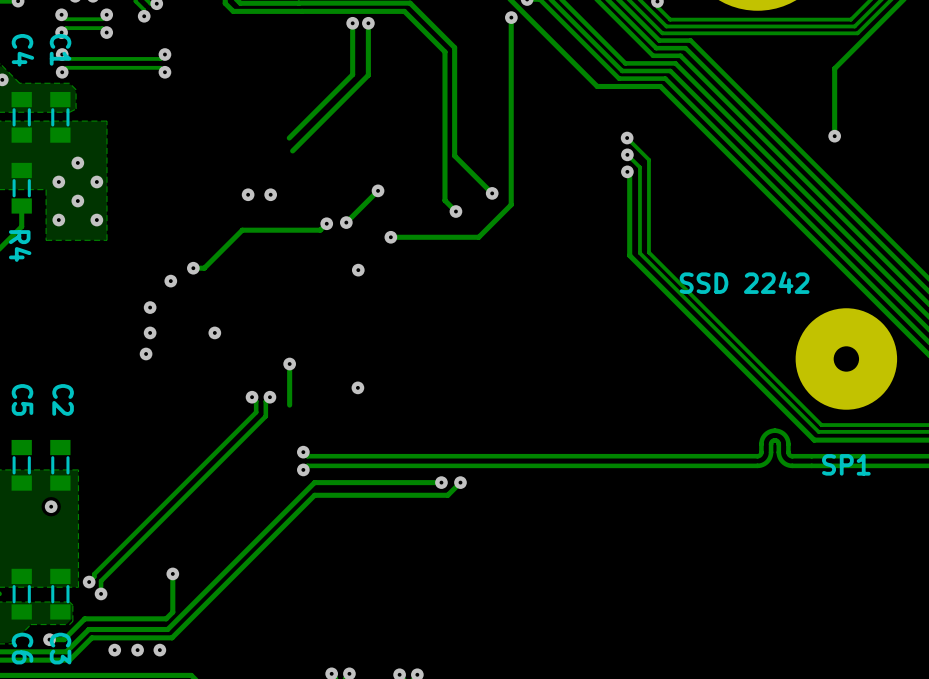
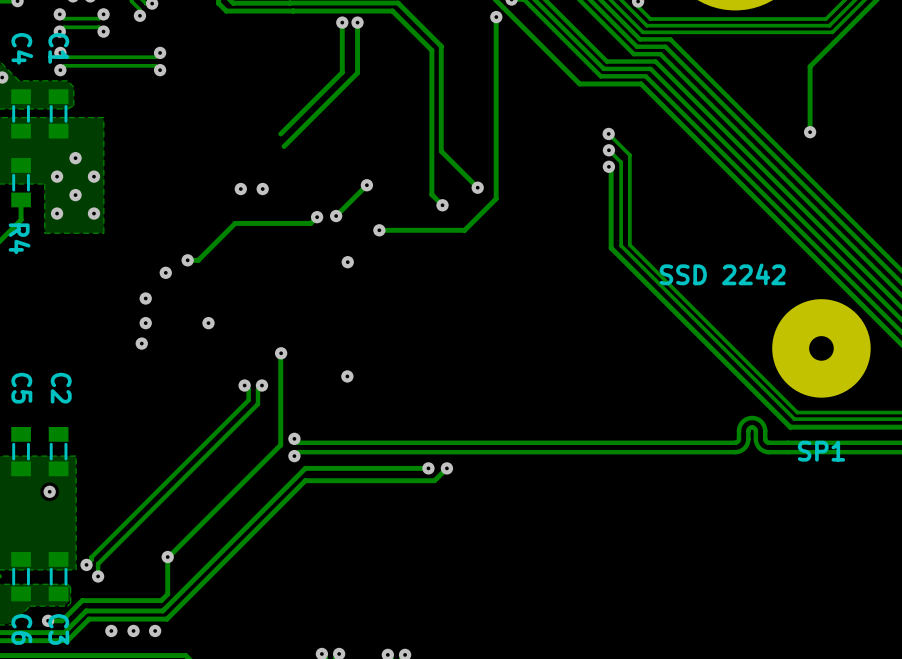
track: (289, 364) (289, 405) -> (281, 353) (280, 445) (167, 557)

